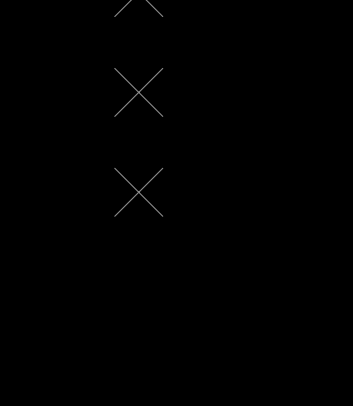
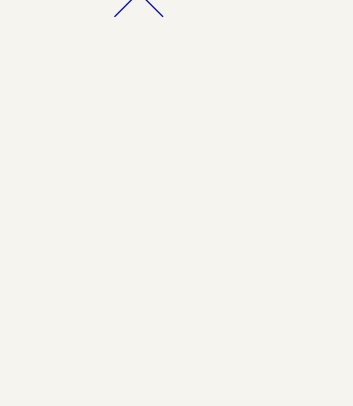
no-connect mark: (138, 92) -> none
no-connect mark: (138, 192) -> none

